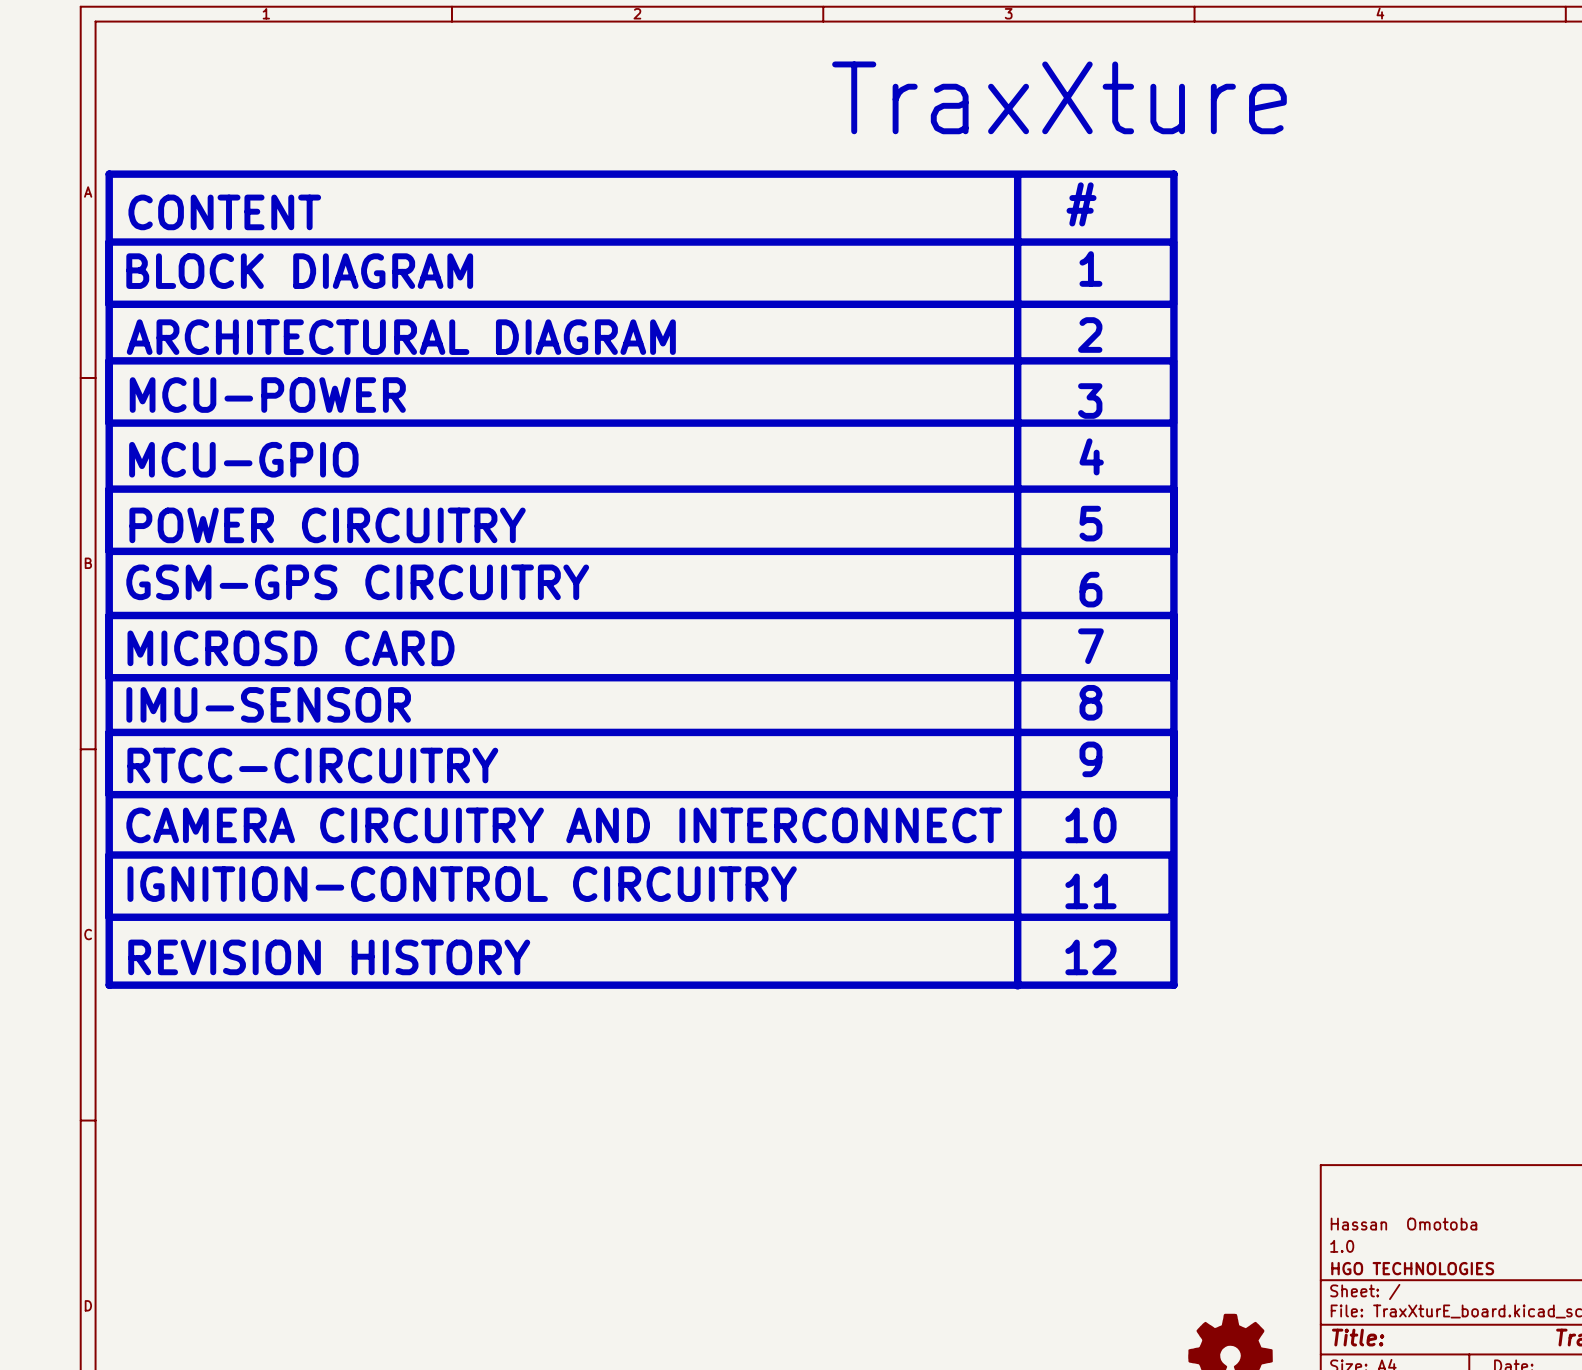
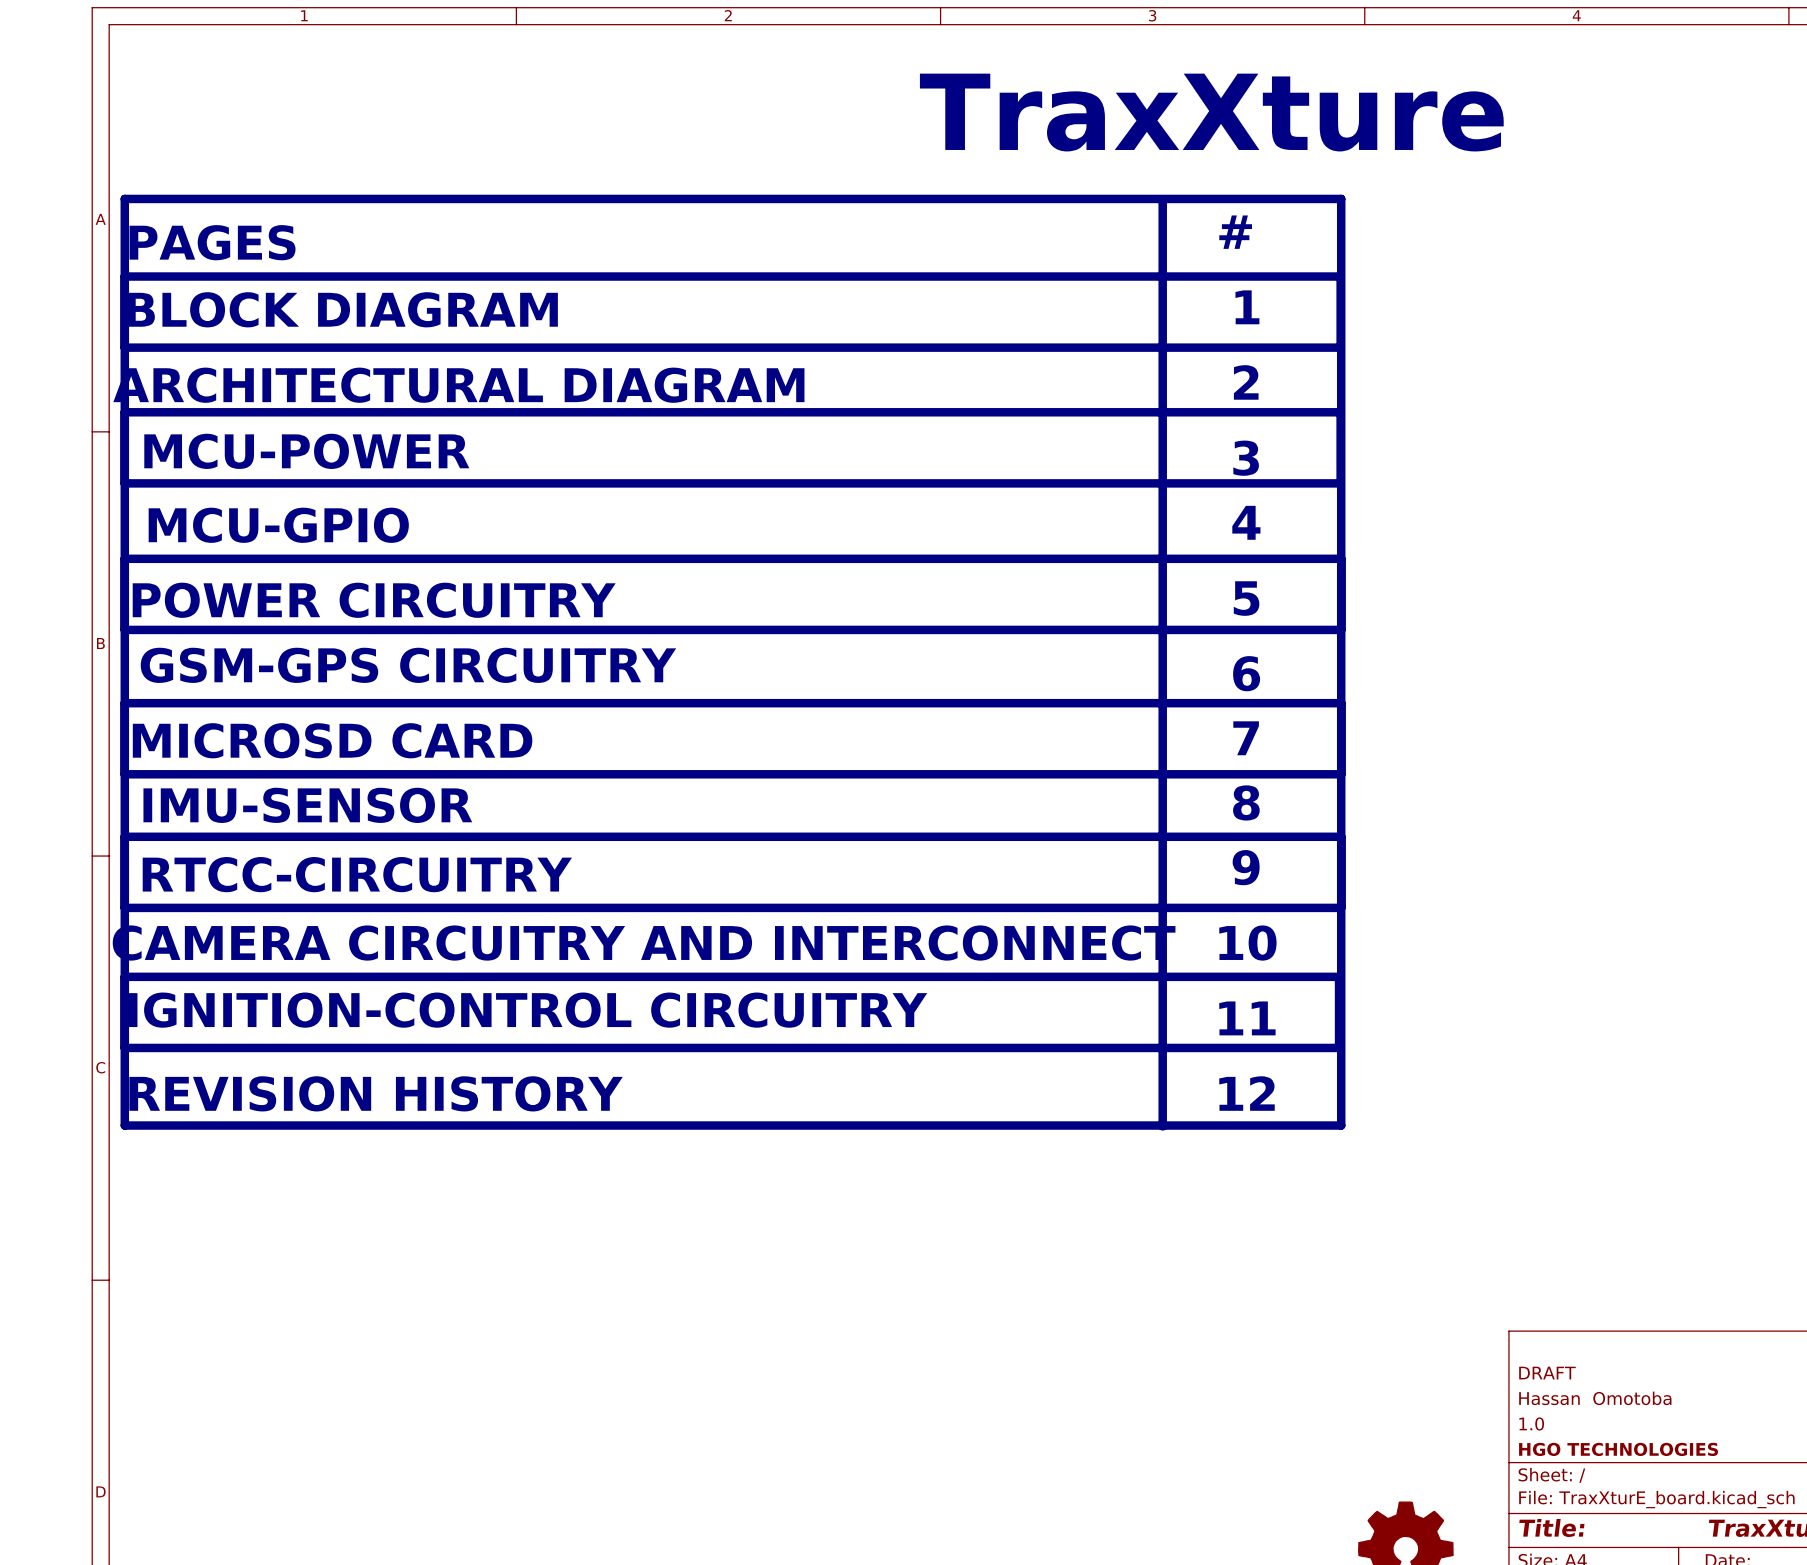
text: none -> PAGES (212, 242)
text: CONTENT (224, 212) -> none
title block: none -> DRAFT (1547, 1373)

